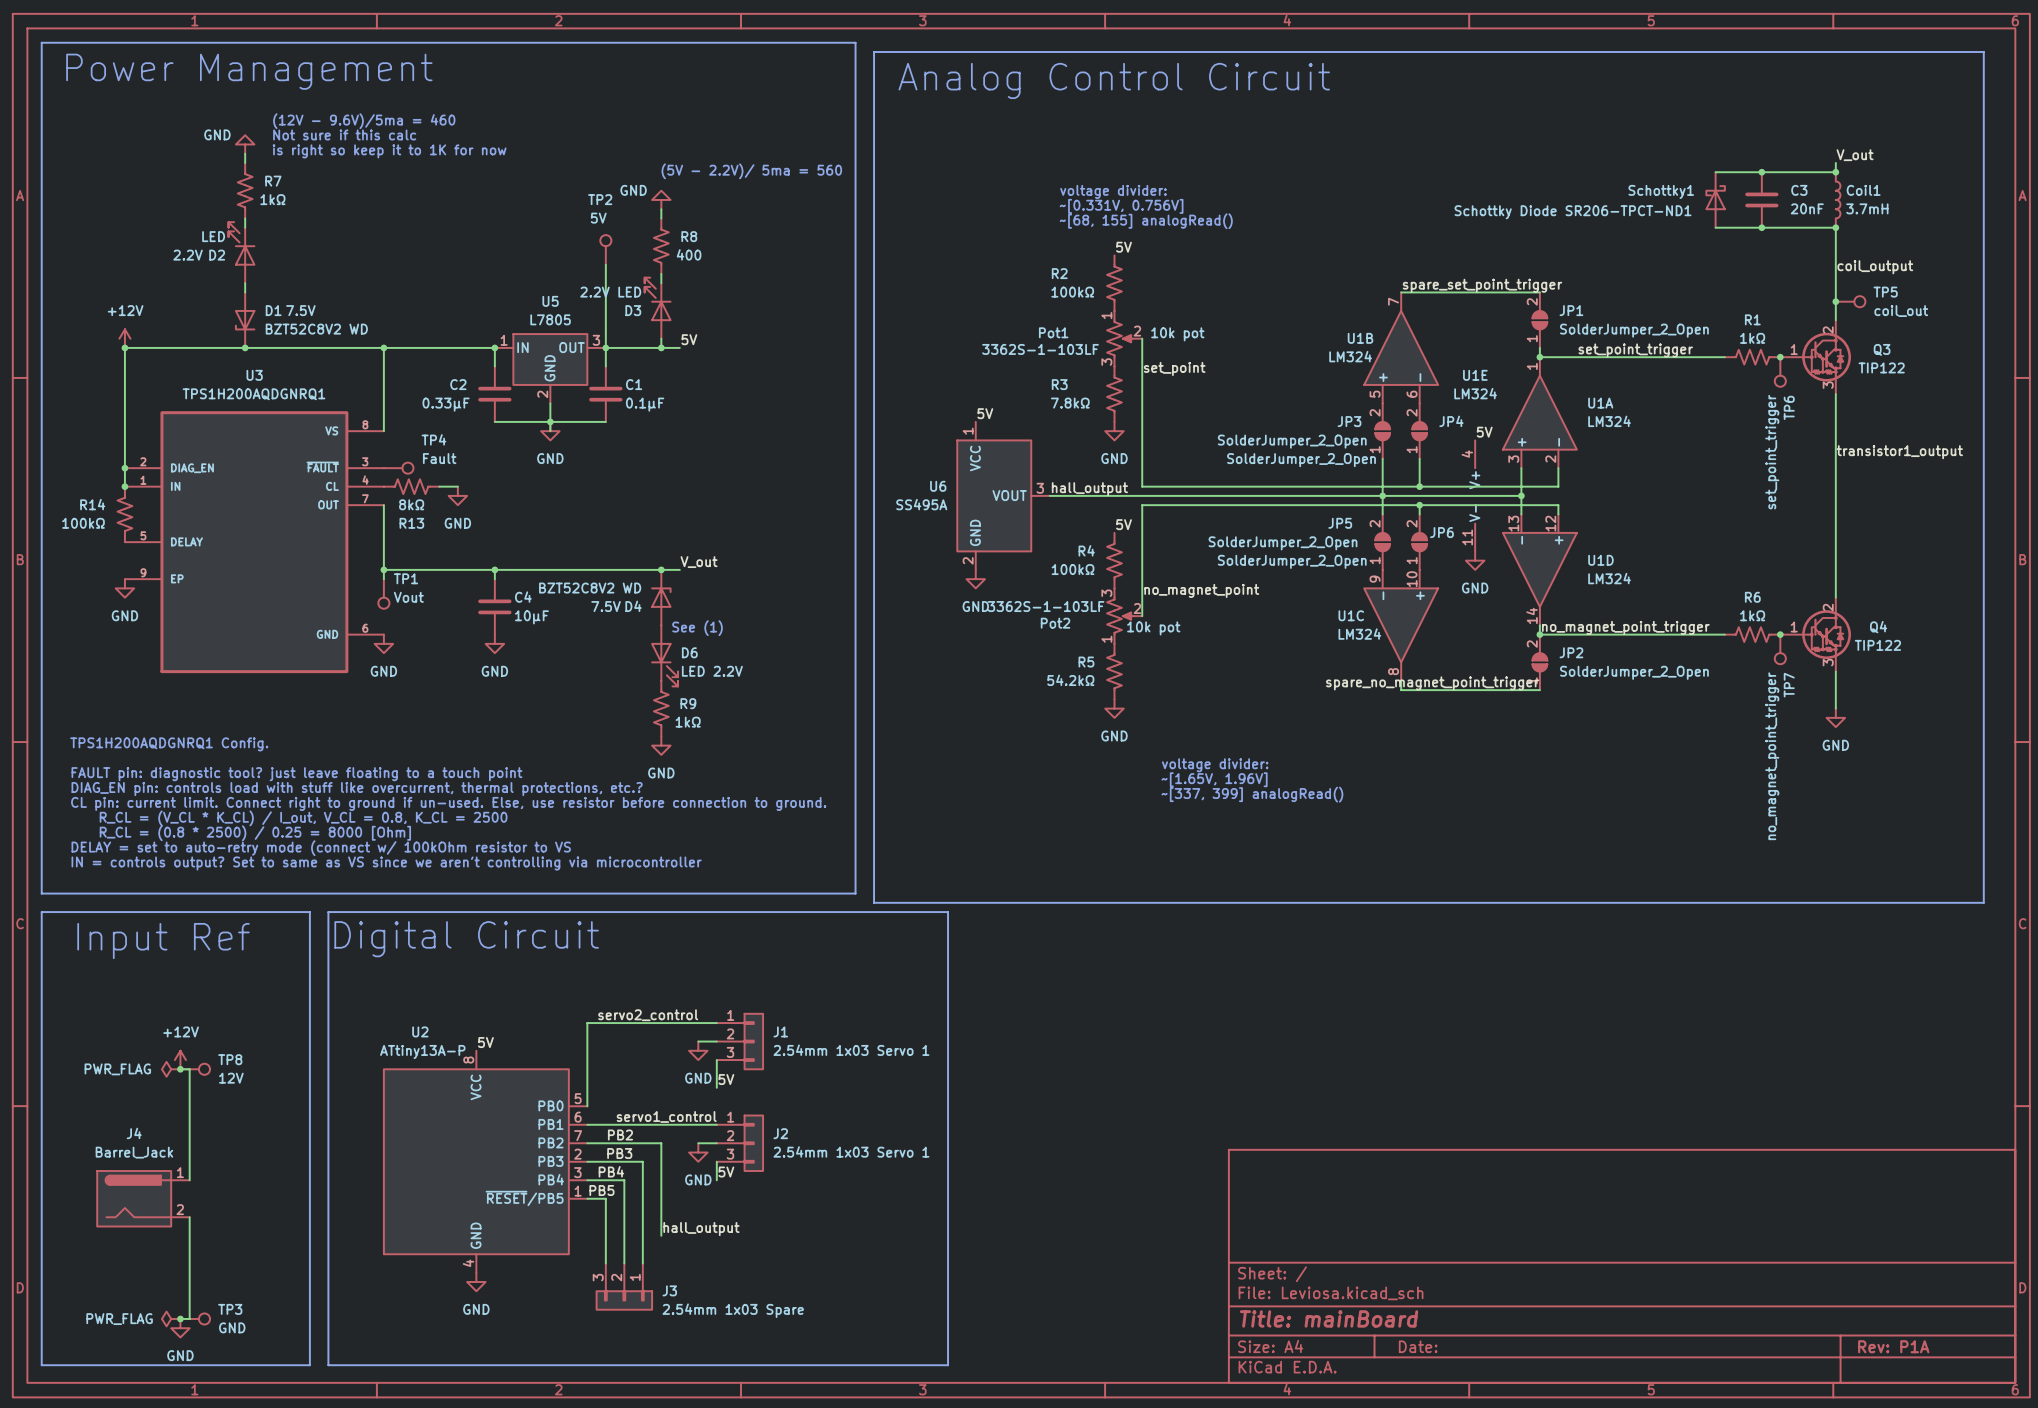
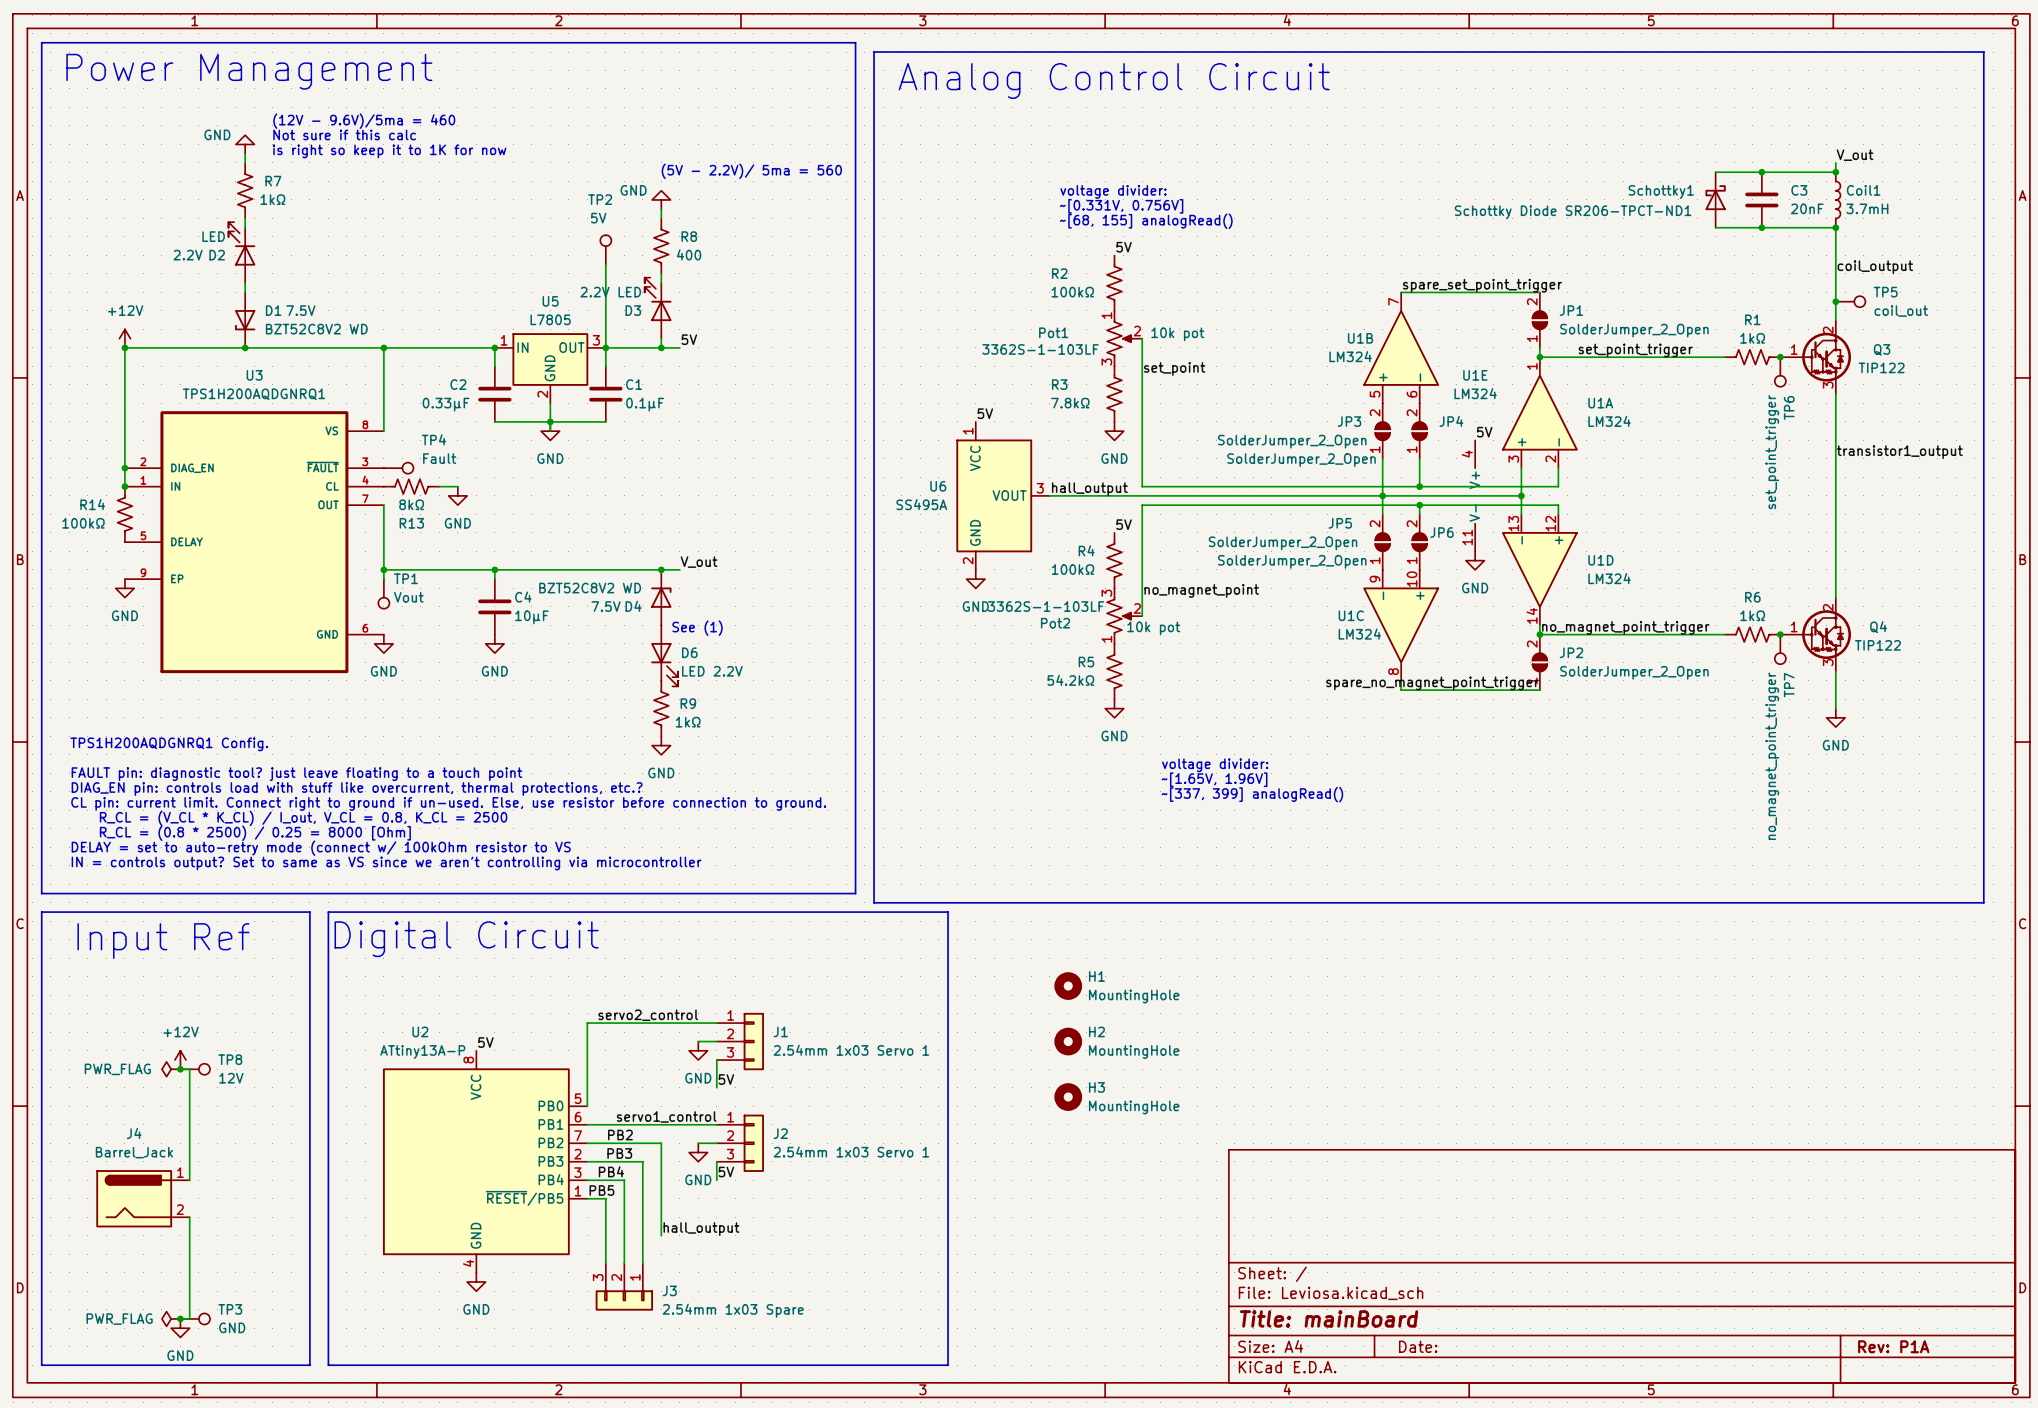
H1: none -> MountingHole (1068, 986)
H2: none -> MountingHole (1068, 1041)
H3: none -> MountingHole (1068, 1097)

